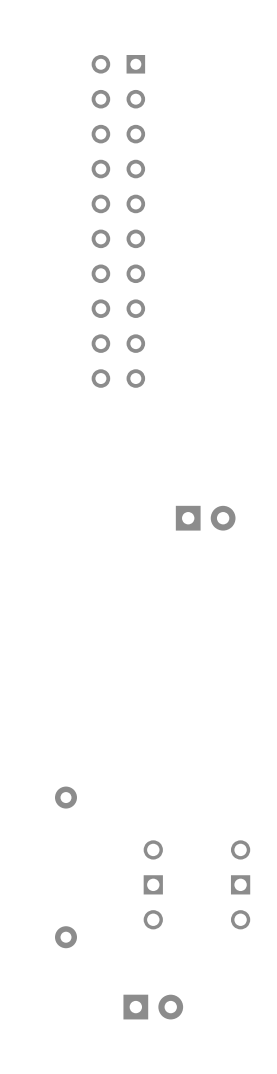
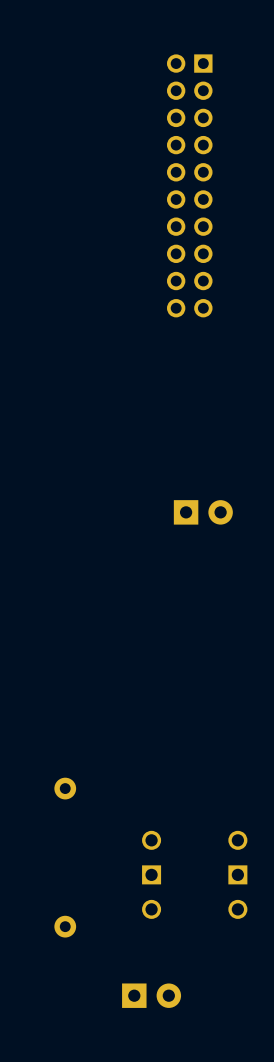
part: none -> (189, 185)
part: (118, 221) -> none

